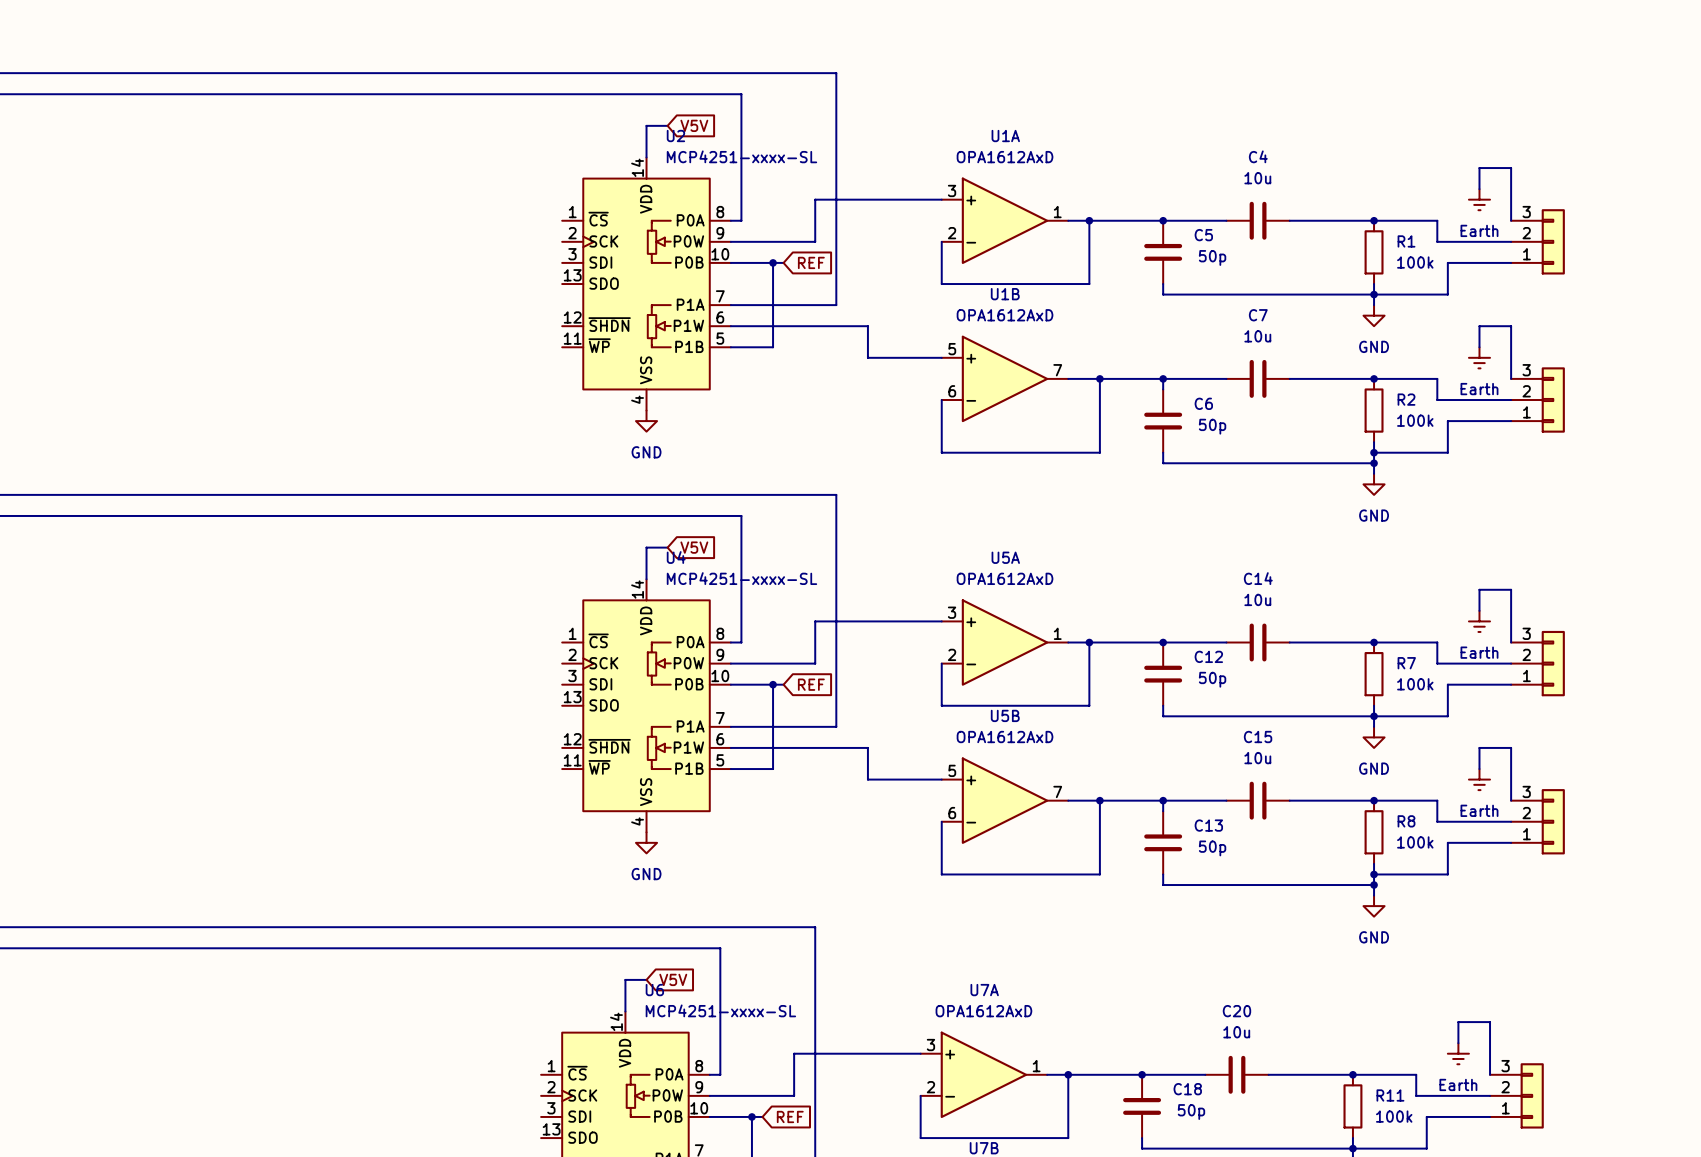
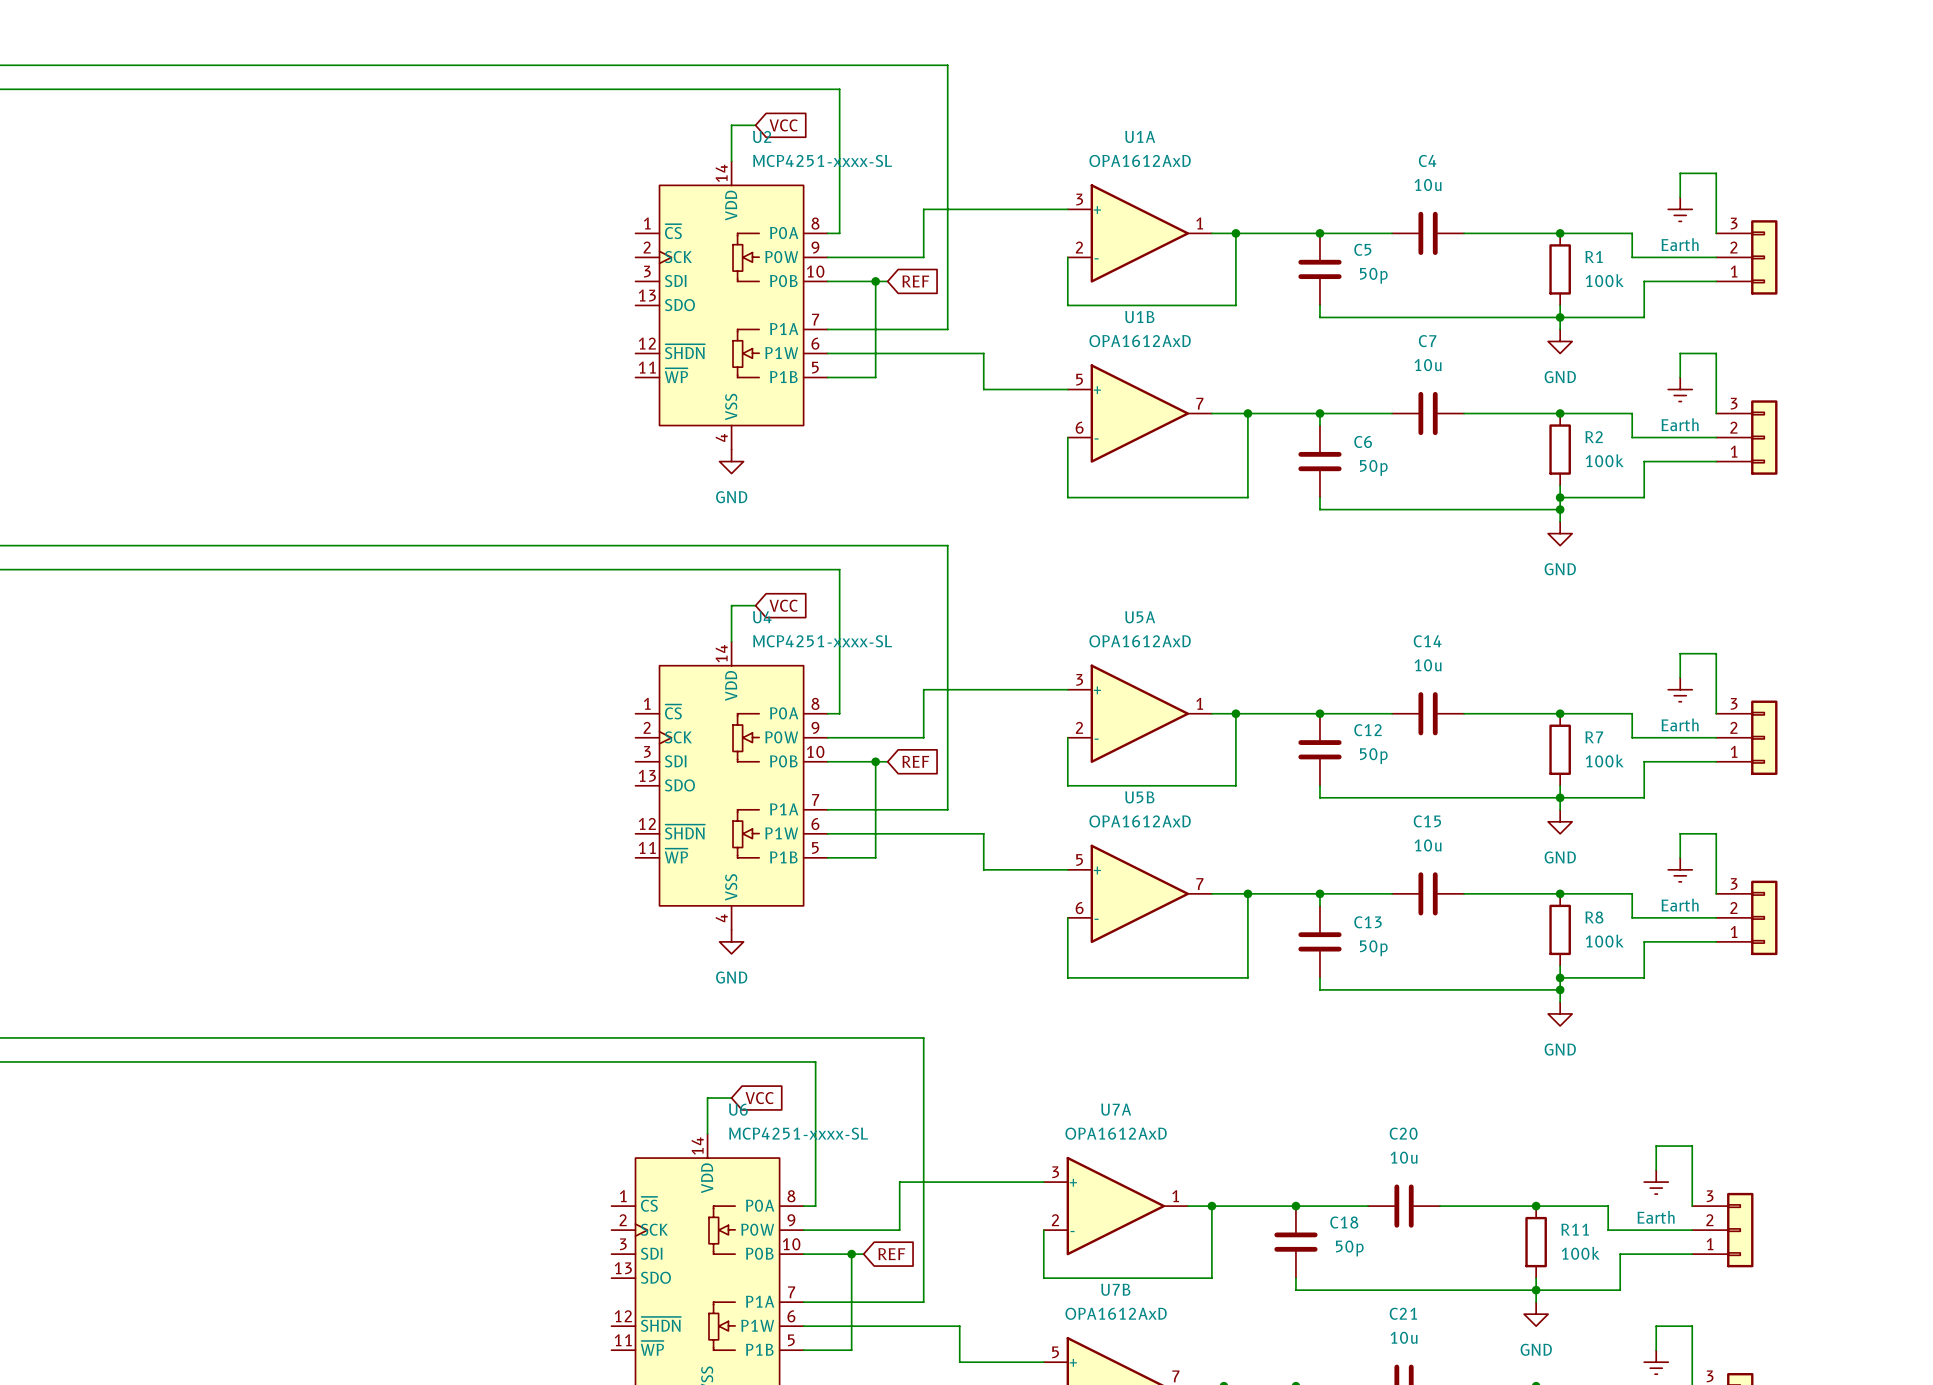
global label: V5V (694, 125) -> VCC (783, 125)
global label: V5V (694, 547) -> VCC (783, 605)
global label: V5V (673, 979) -> VCC (759, 1098)

